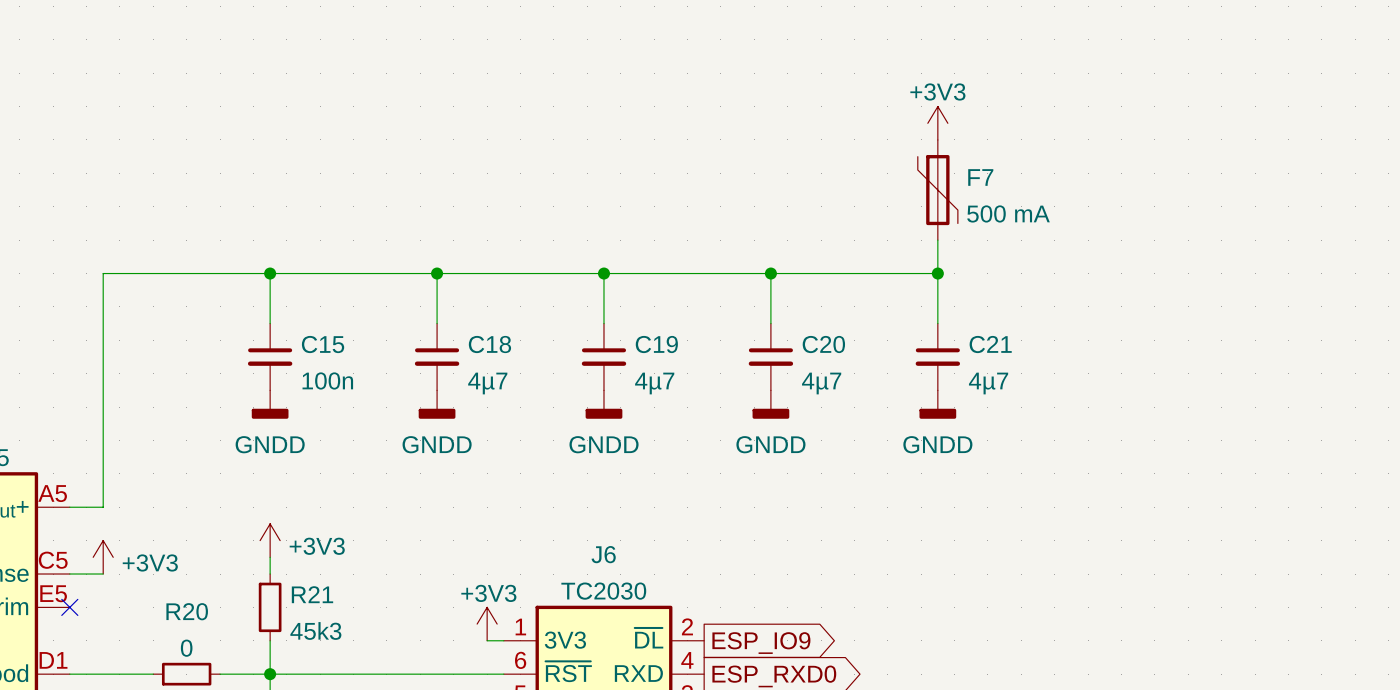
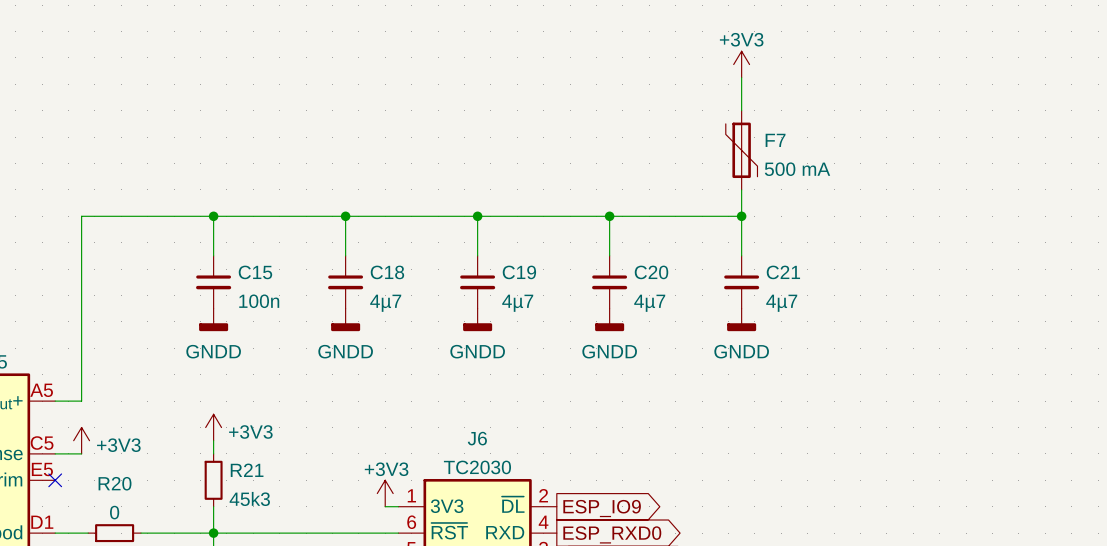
power symbol position: +3V3 (937, 123) -> +3V3 (741, 64)
wire: (111, 674) (153, 674) -> (141, 533) (174, 533)
R20 position: (186, 674) -> (114, 533)

